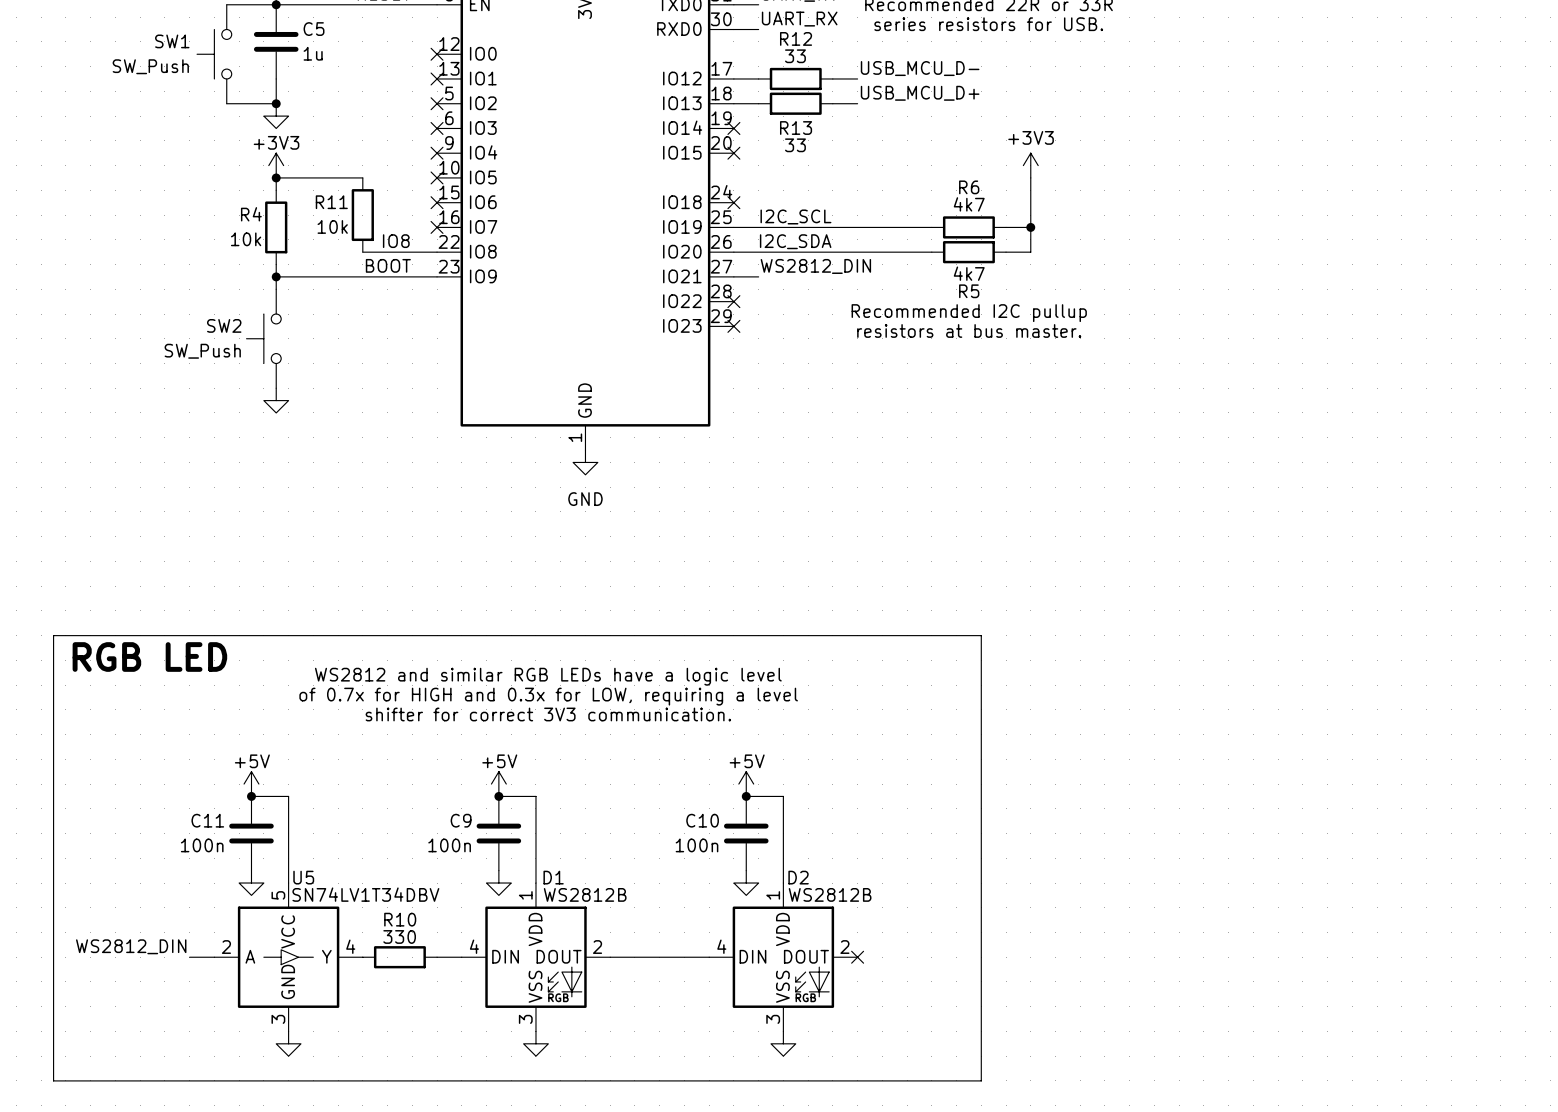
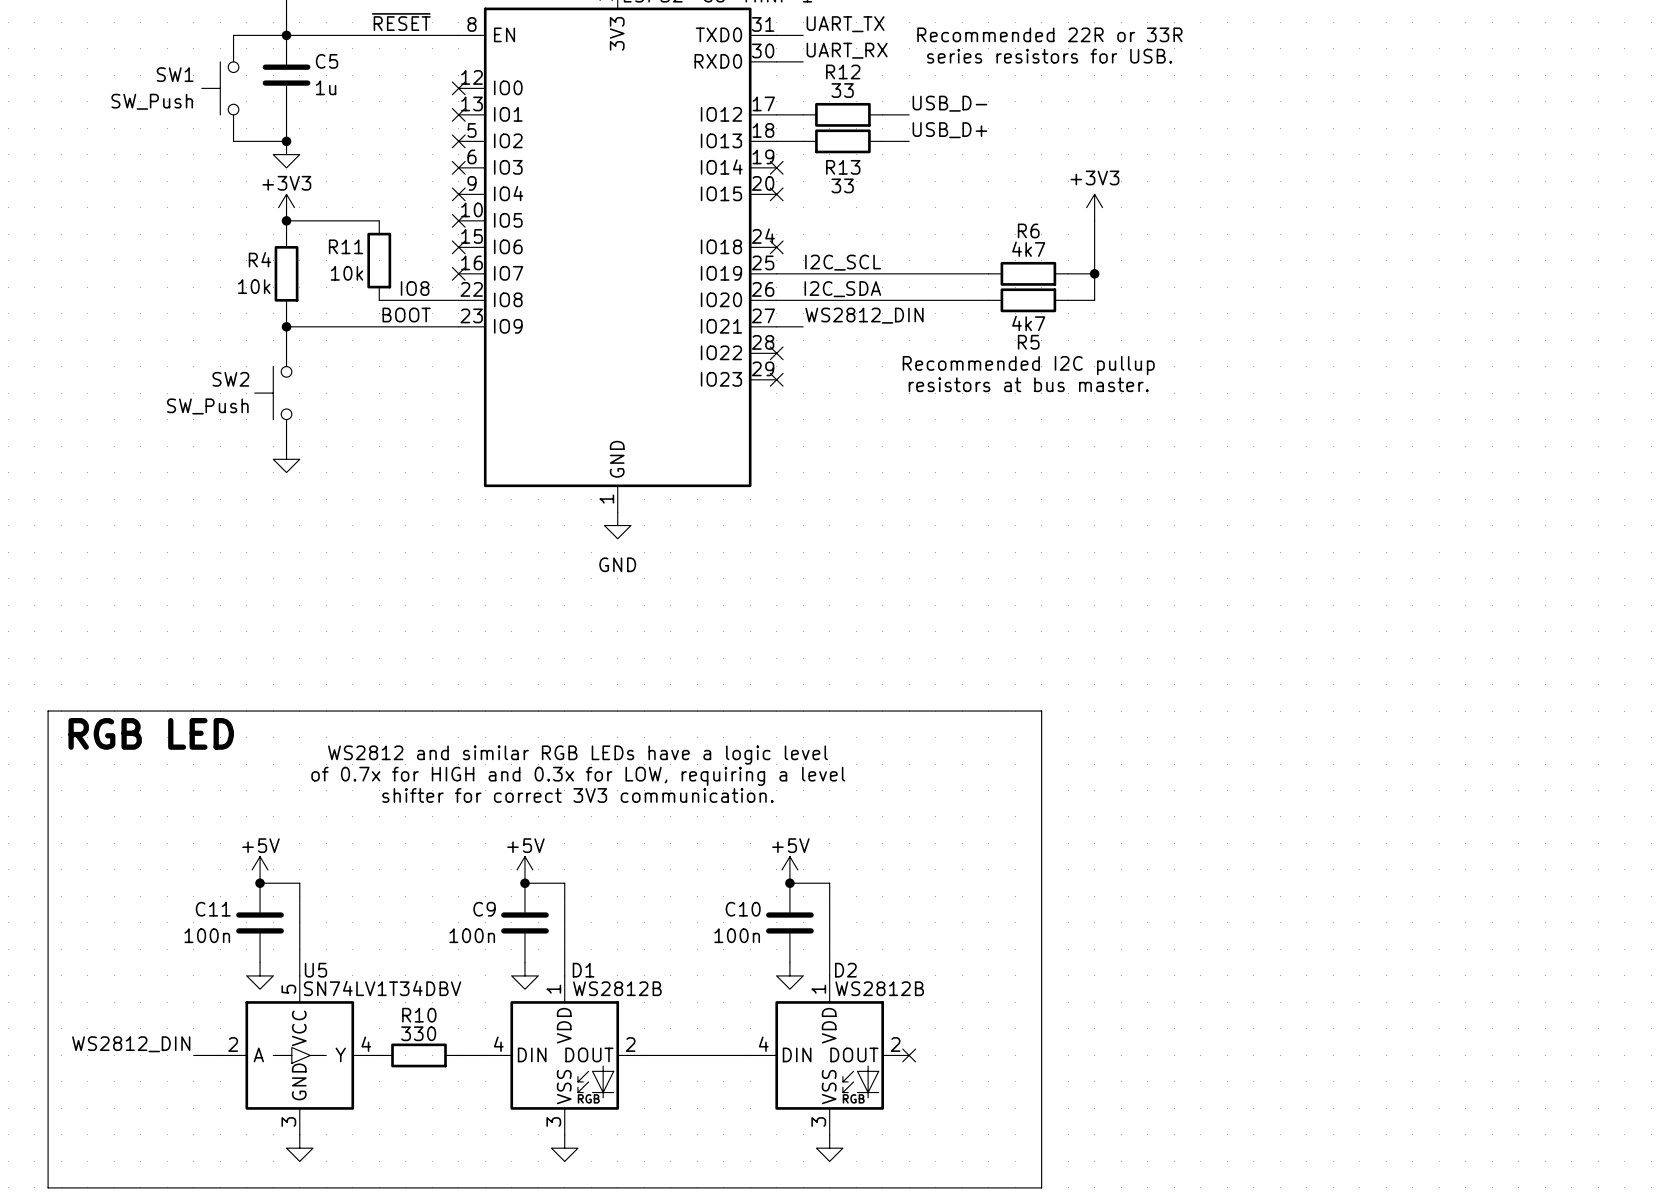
label: USB_MCU_D- (920, 68) -> USB_D- (949, 103)
label: USB_MCU_D+ (920, 93) -> USB_D+ (949, 130)

